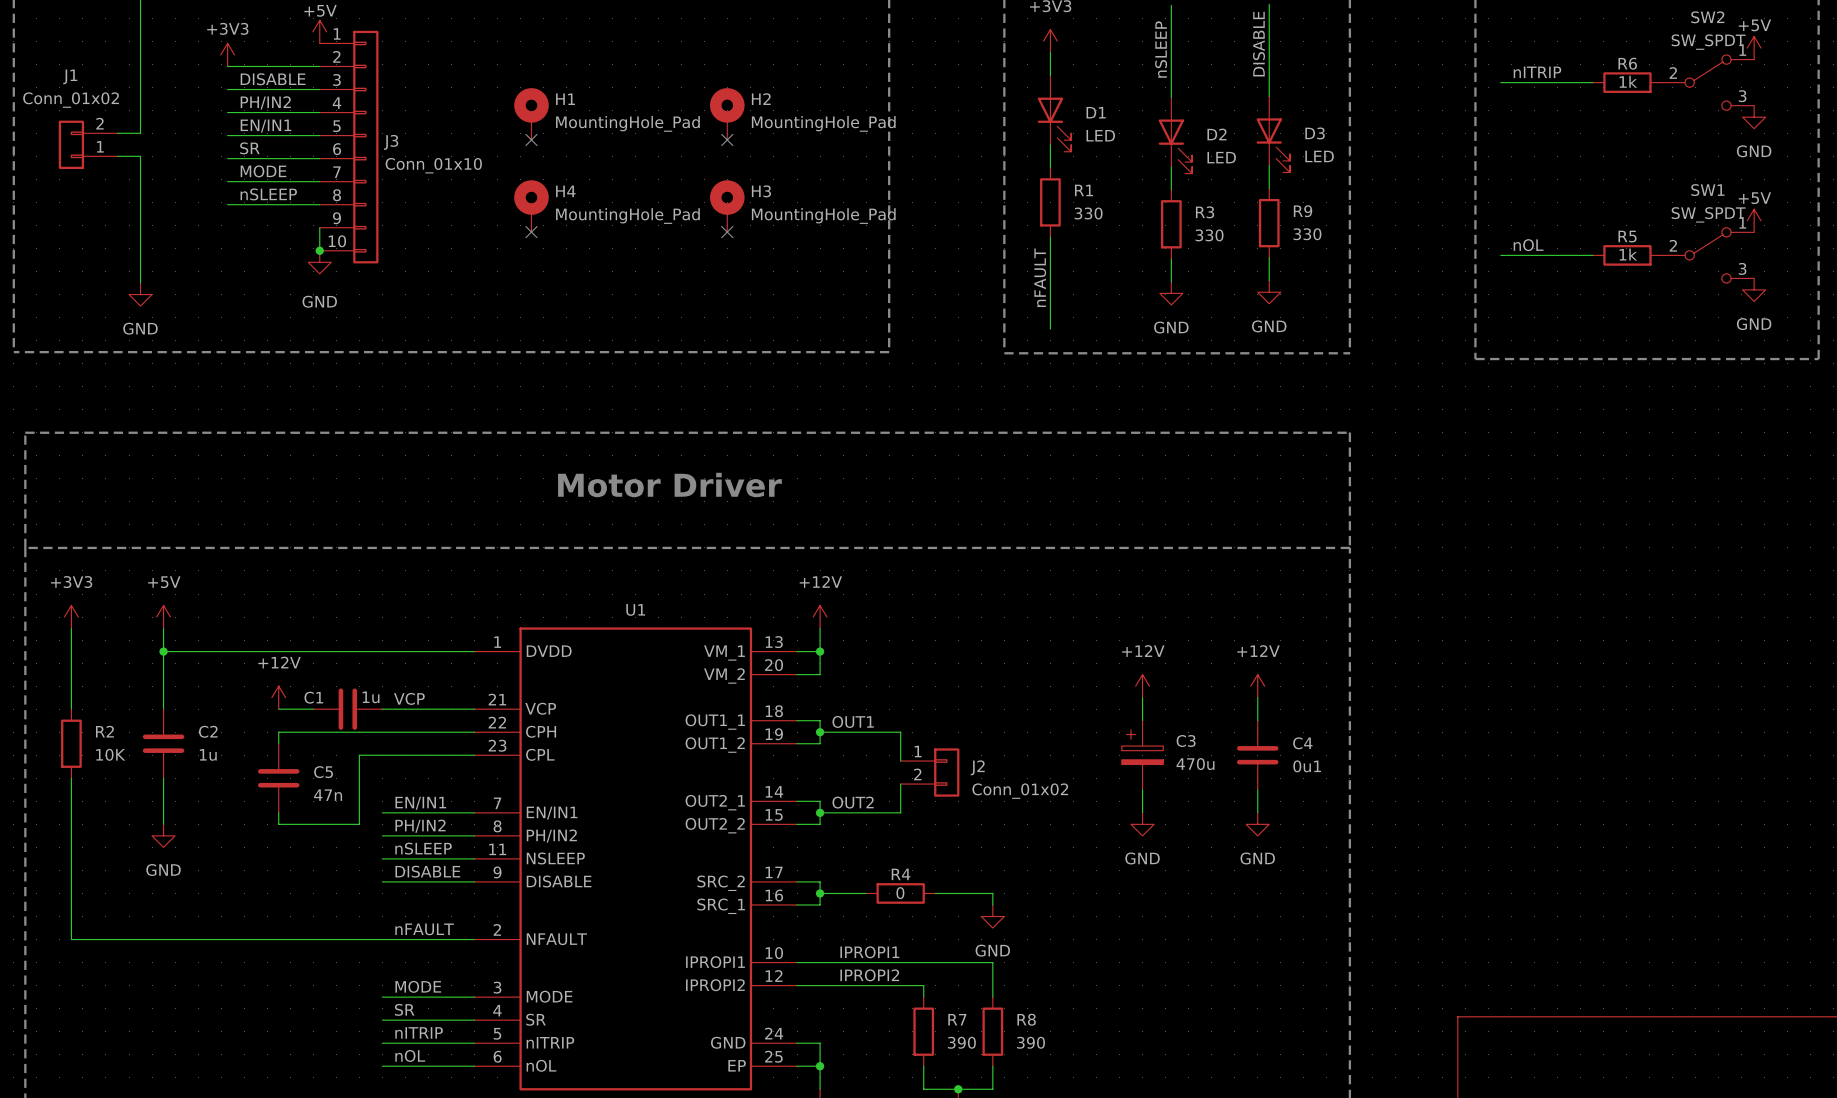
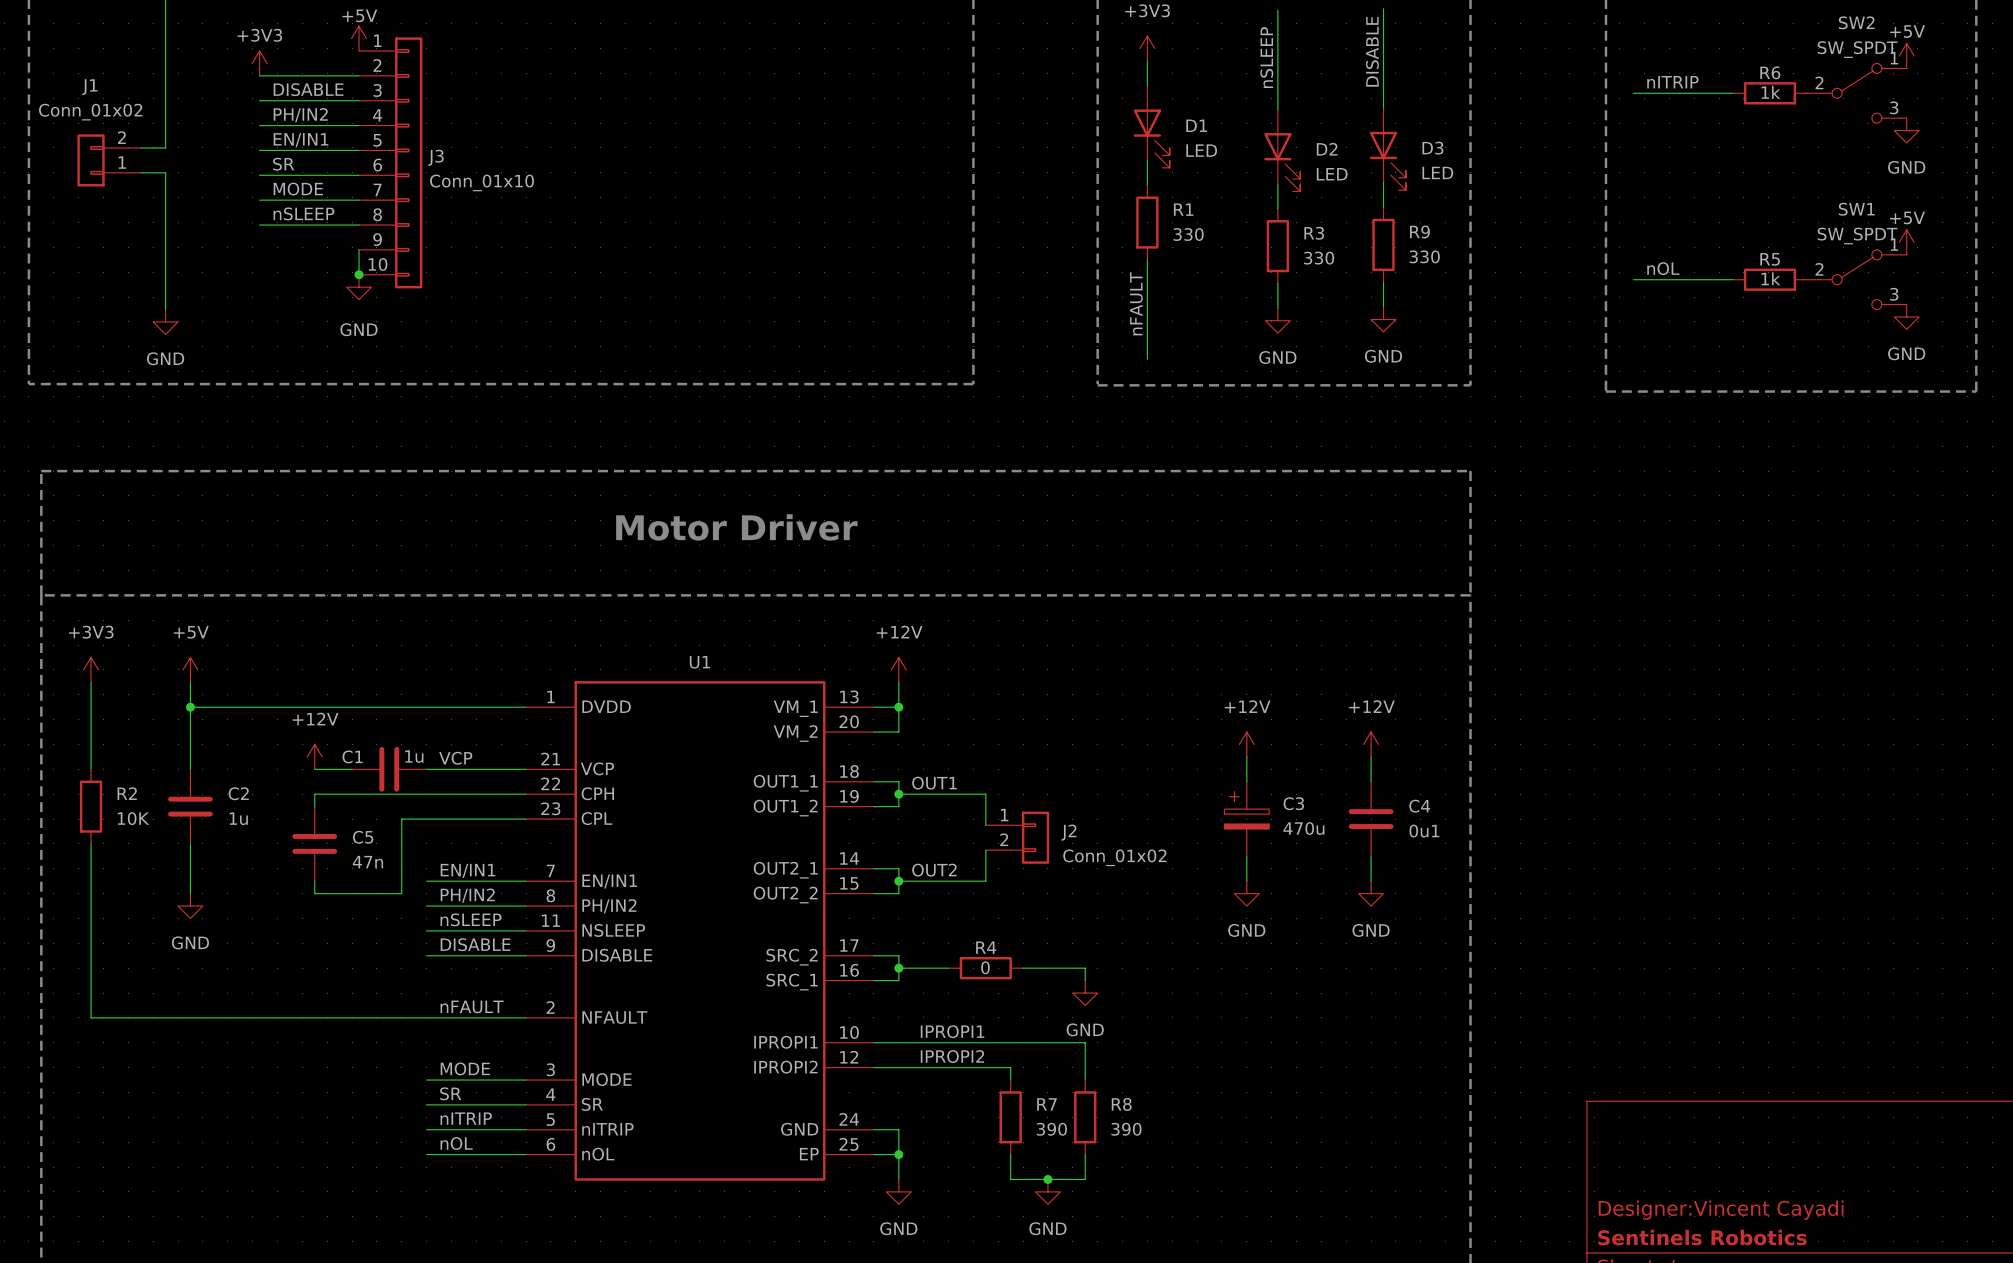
H1: MountingHole_Pad (531, 114) -> none
H2: MountingHole_Pad (727, 114) -> none
no-connect mark: (531, 139) -> none
no-connect mark: (727, 139) -> none
H4: MountingHole_Pad (531, 206) -> none
H3: MountingHole_Pad (727, 206) -> none
no-connect mark: (531, 232) -> none
no-connect mark: (727, 232) -> none

